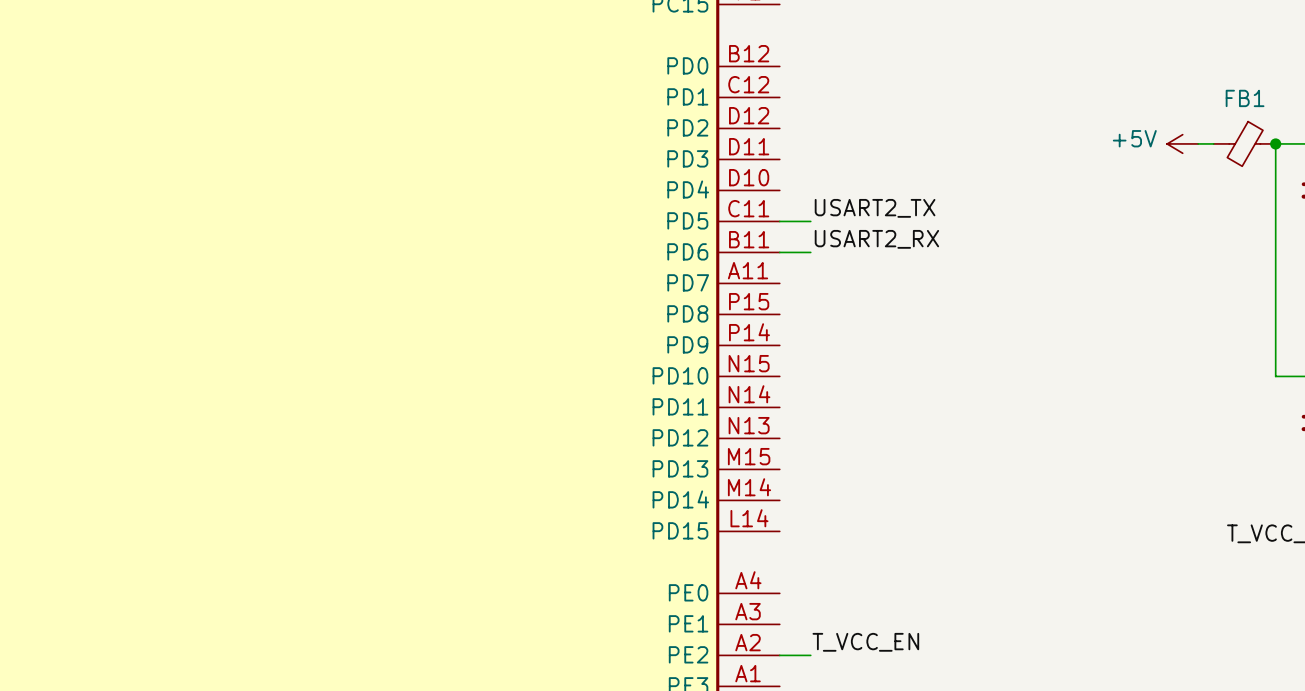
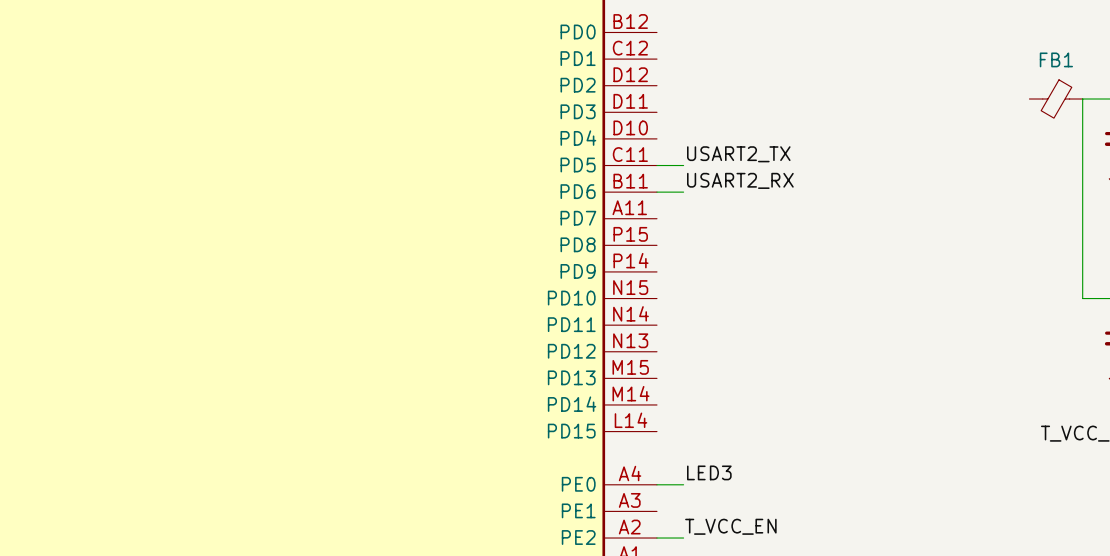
power symbol: +5V (1182, 143) -> none
wire: (1198, 143) (1213, 143) -> none
junction: (1275, 143) -> none
label: none -> LED3 (709, 472)
wire: none -> (656, 484) (683, 484)

